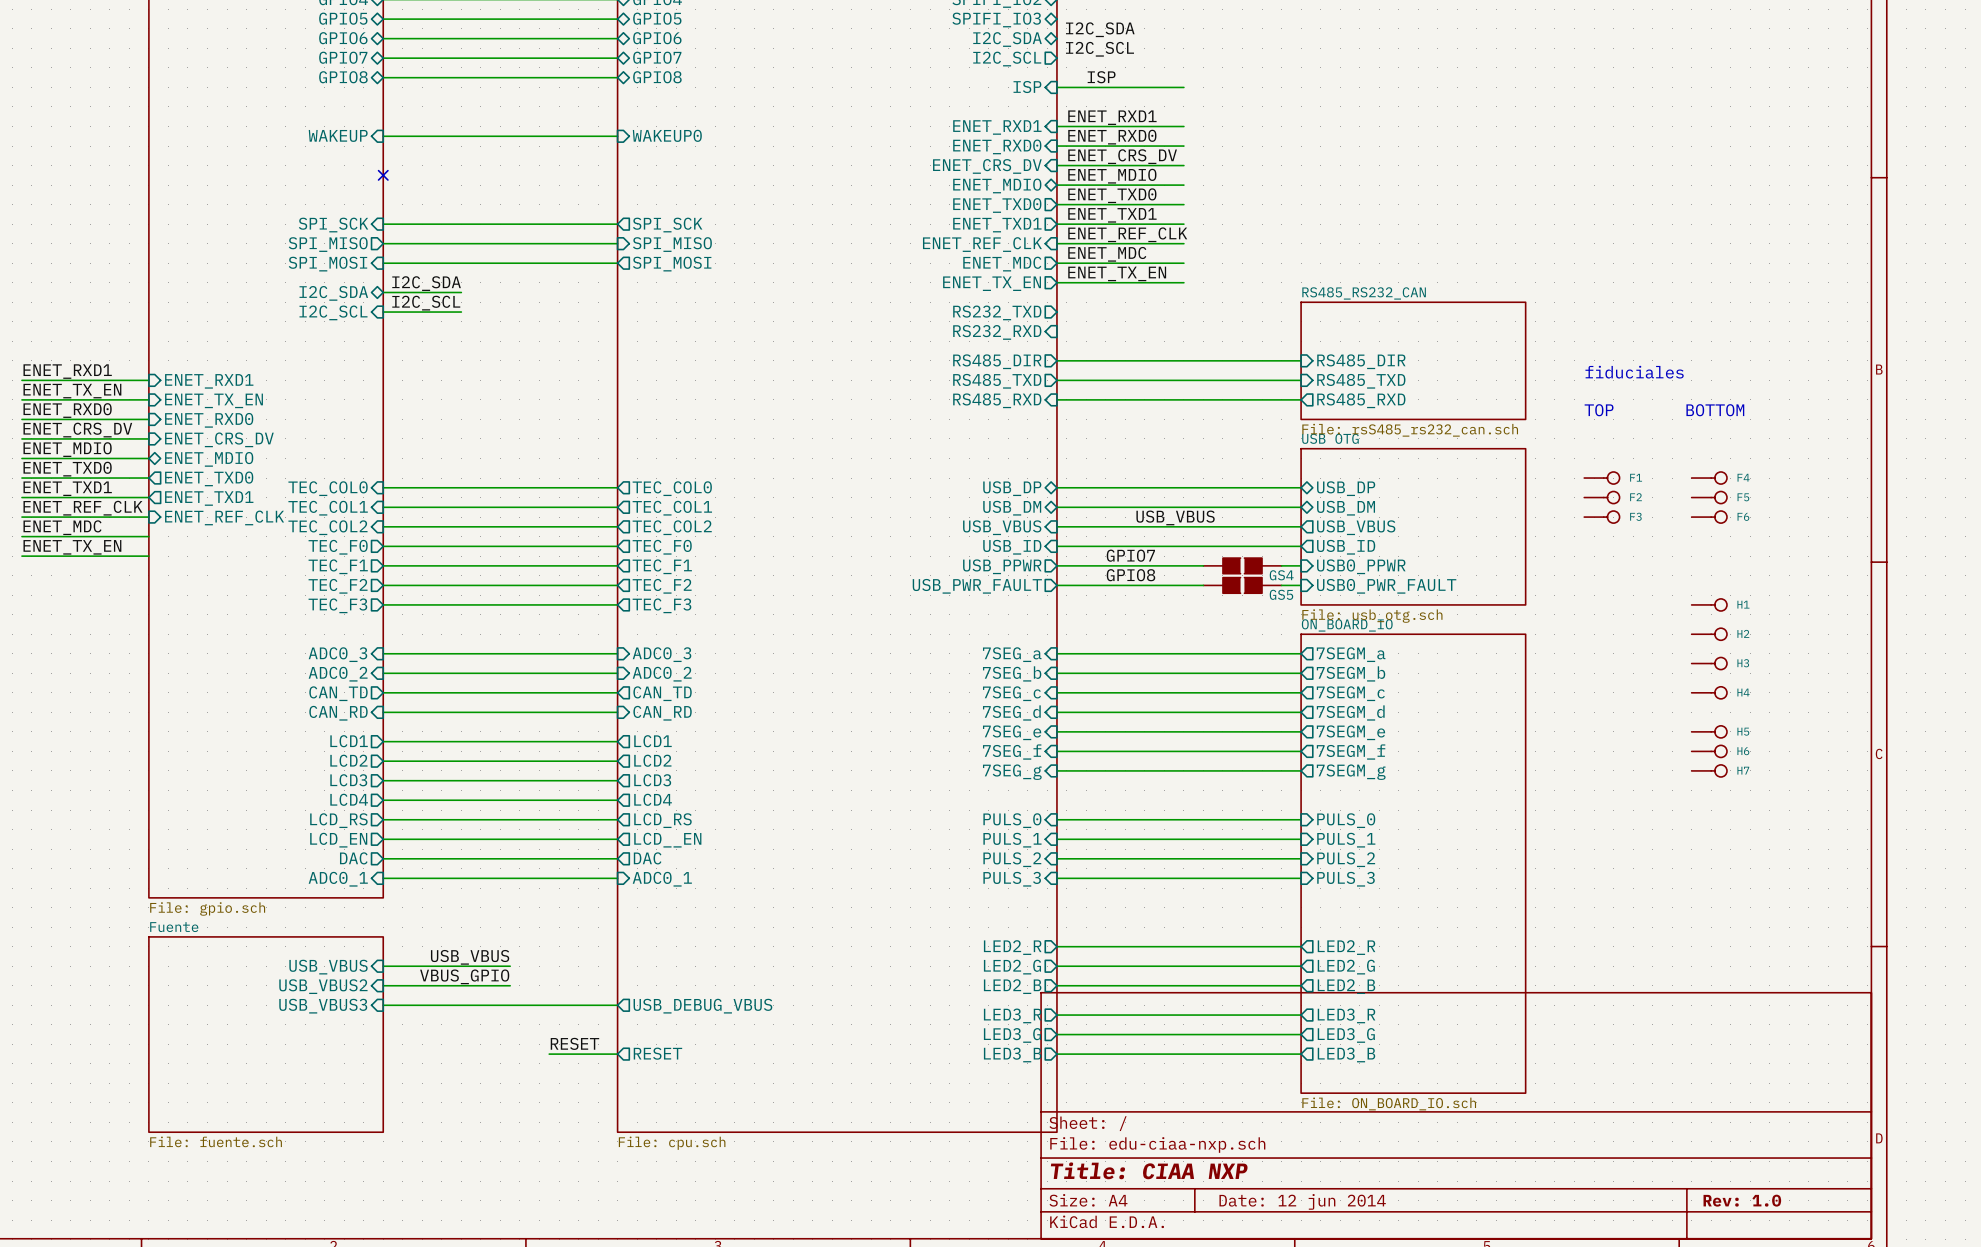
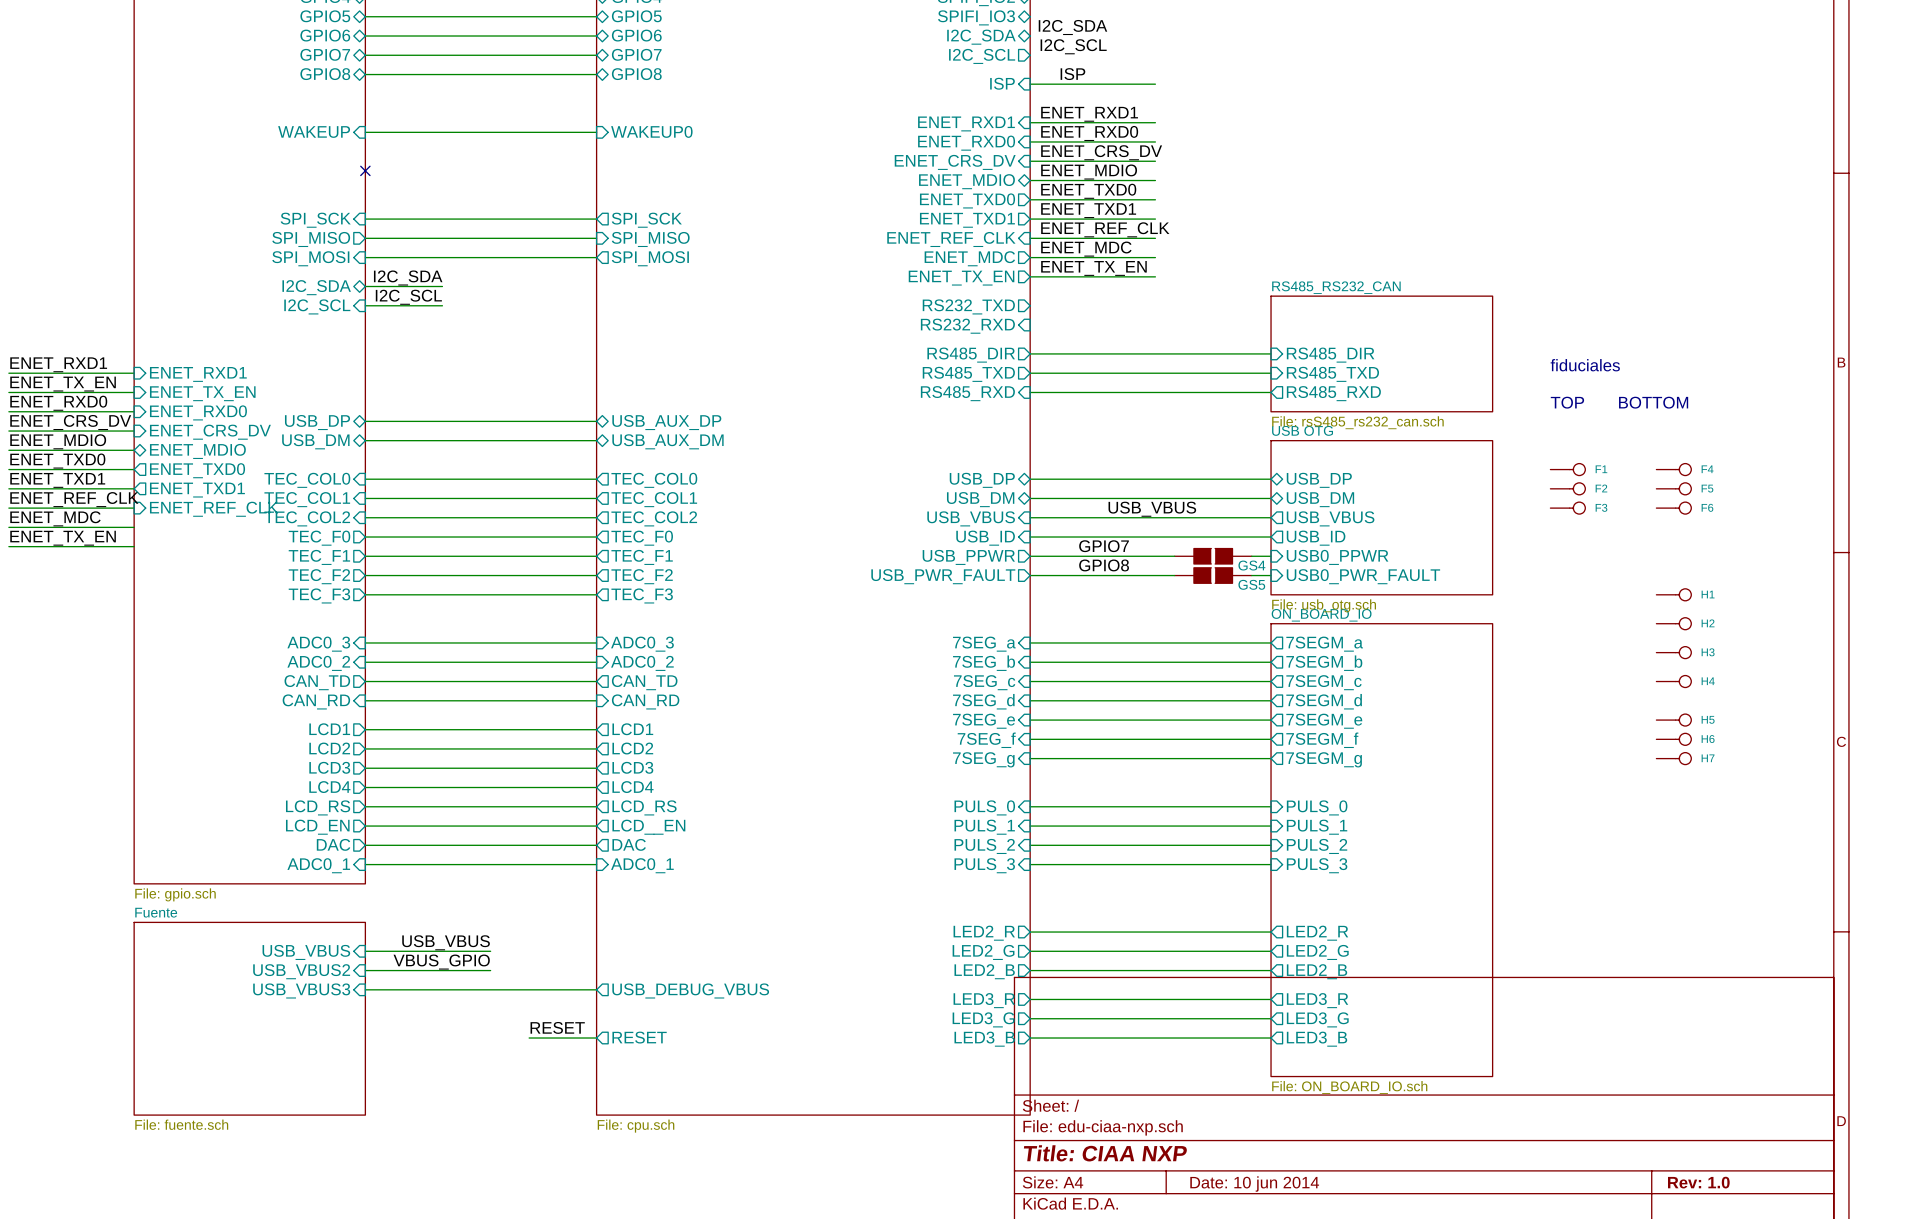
wire: none -> (365, 421) (596, 421)
sheet pin: none -> USB_DP (317, 422)
sheet pin: none -> USB_AUX_DP (666, 422)
wire: none -> (365, 440) (596, 440)
sheet pin: none -> USB_DM (315, 441)
sheet pin: none -> USB_AUX_DM (667, 441)
title block: Date: 12 jun 2014 (1302, 1201) -> Date: 10 jun 2014 (1254, 1184)

